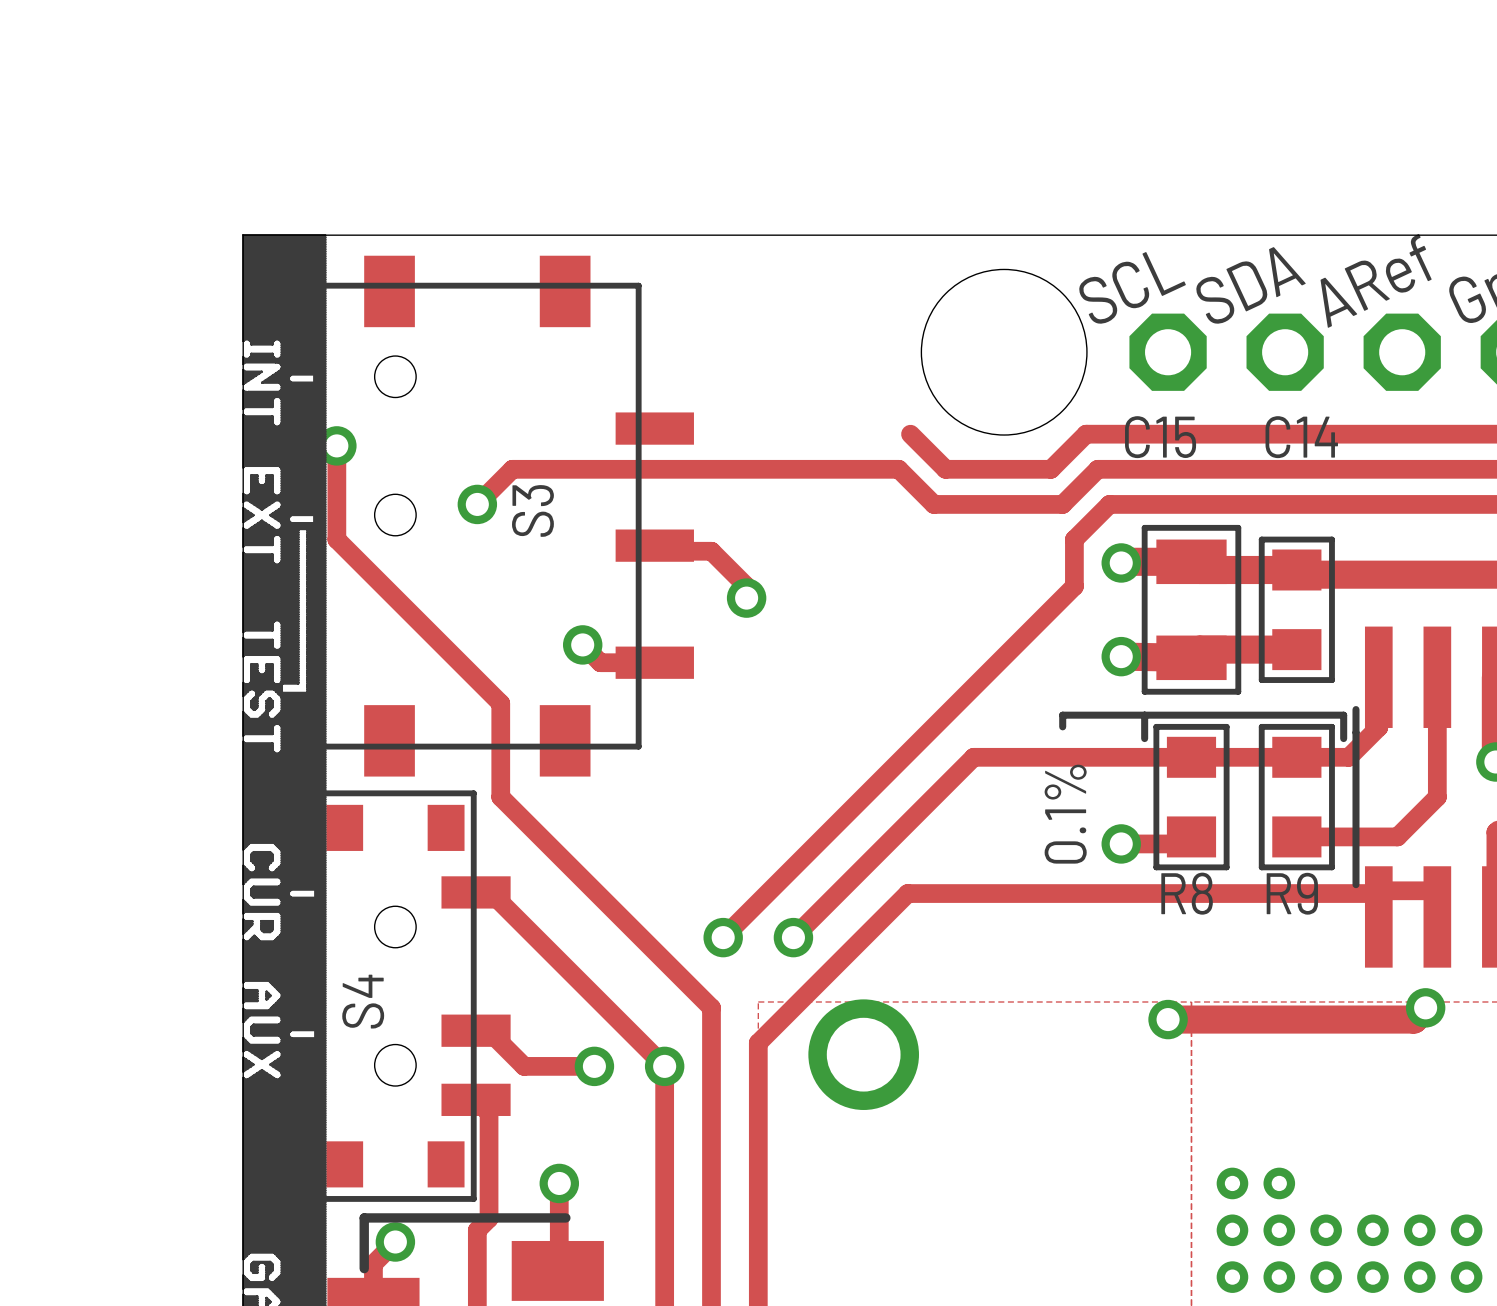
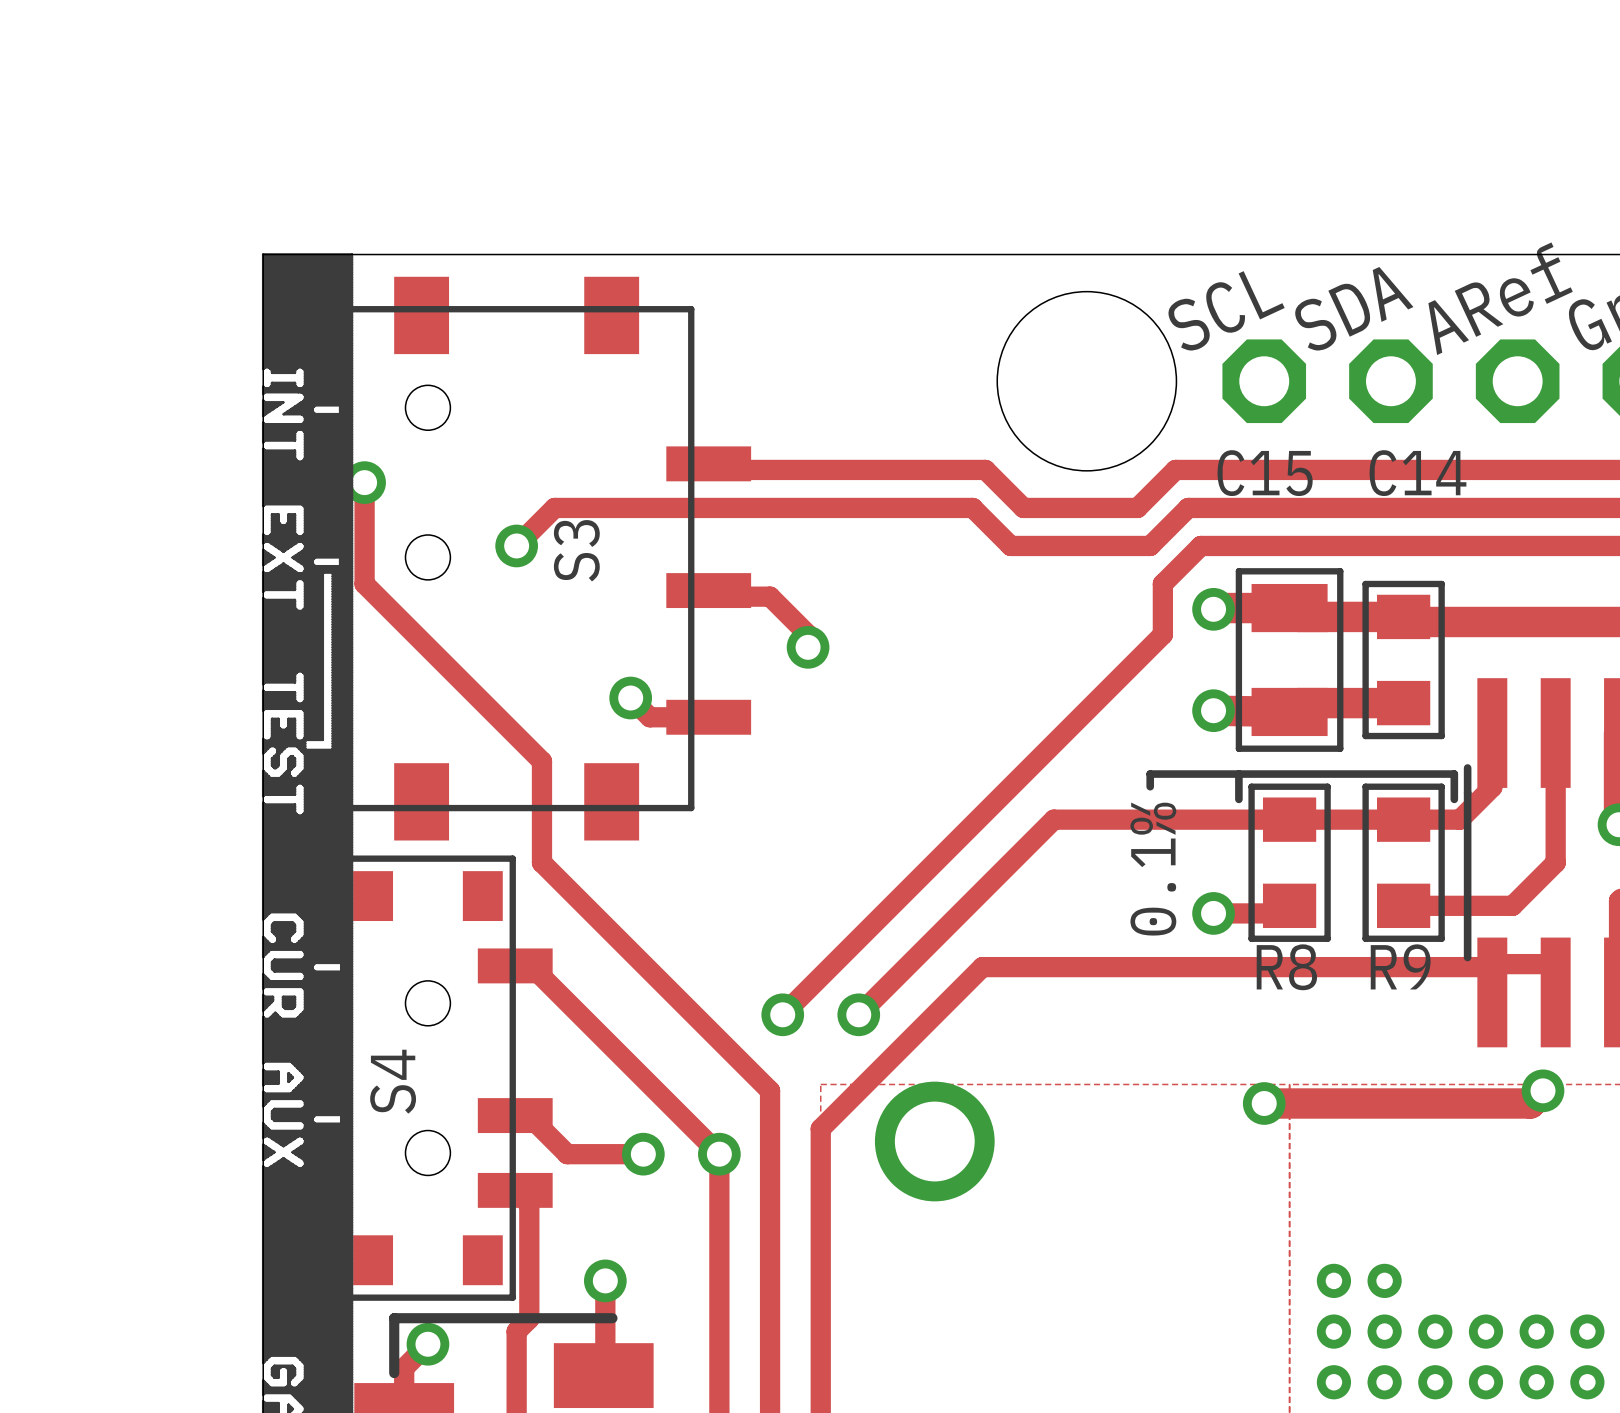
track: none -> (714, 469) (985, 469)

